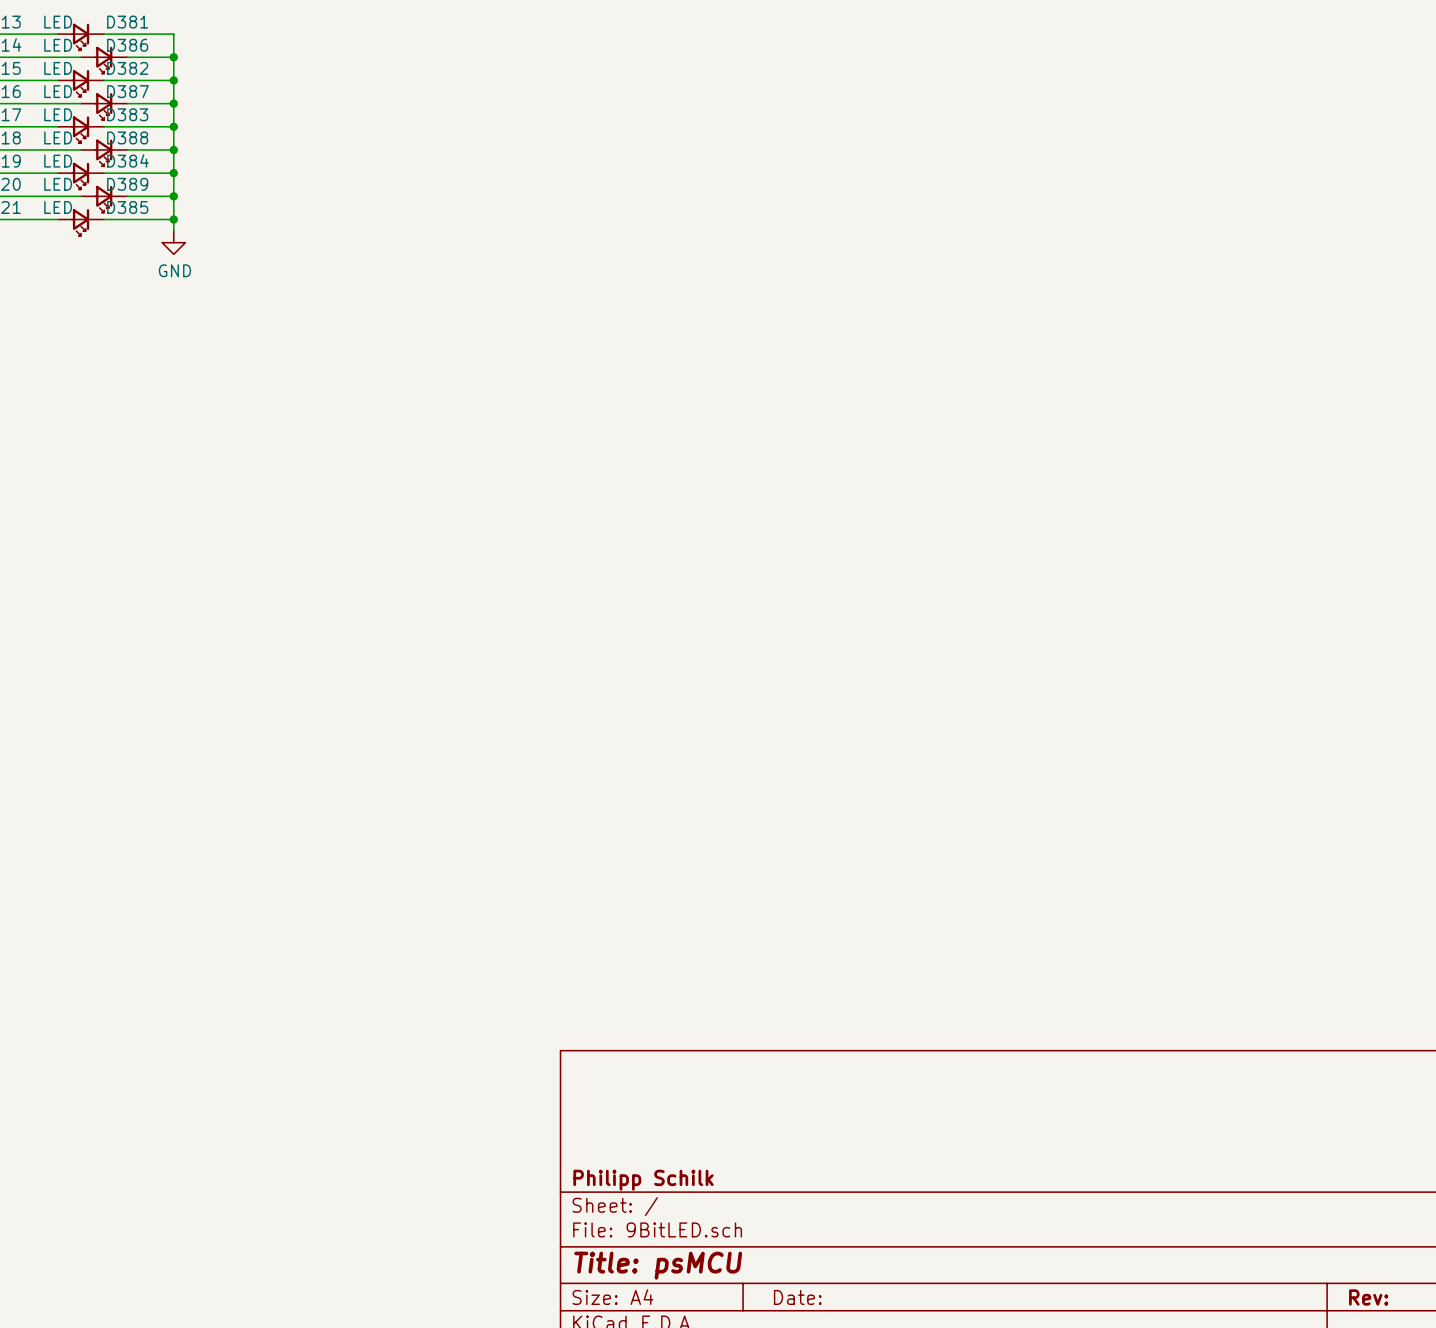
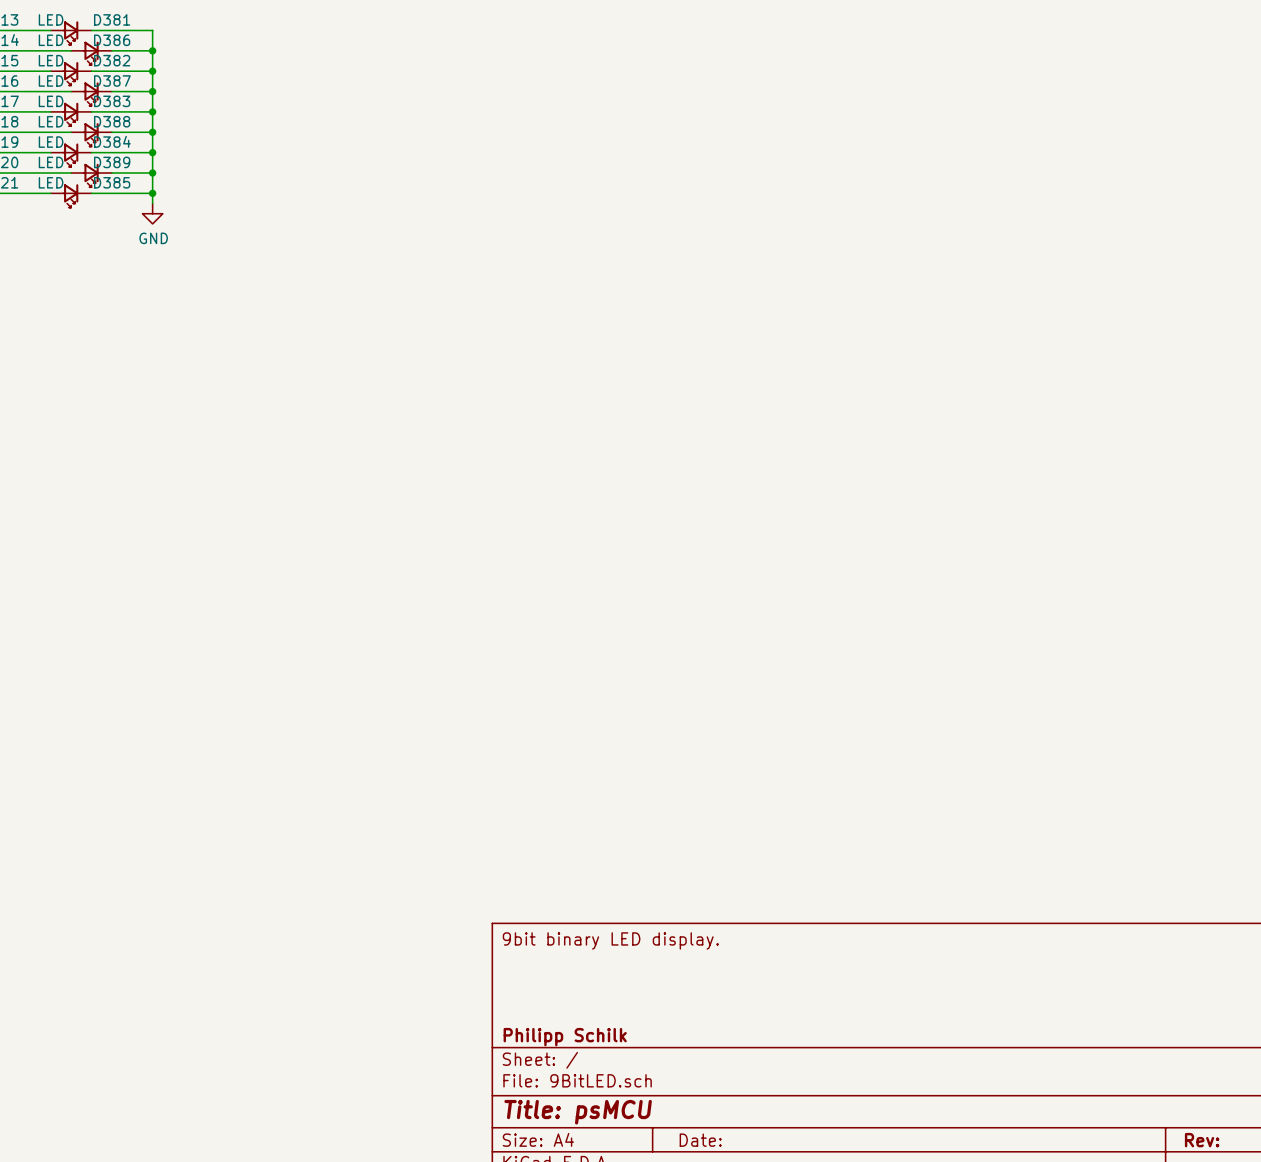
title block: none -> 9bit binary LED display. (610, 940)

